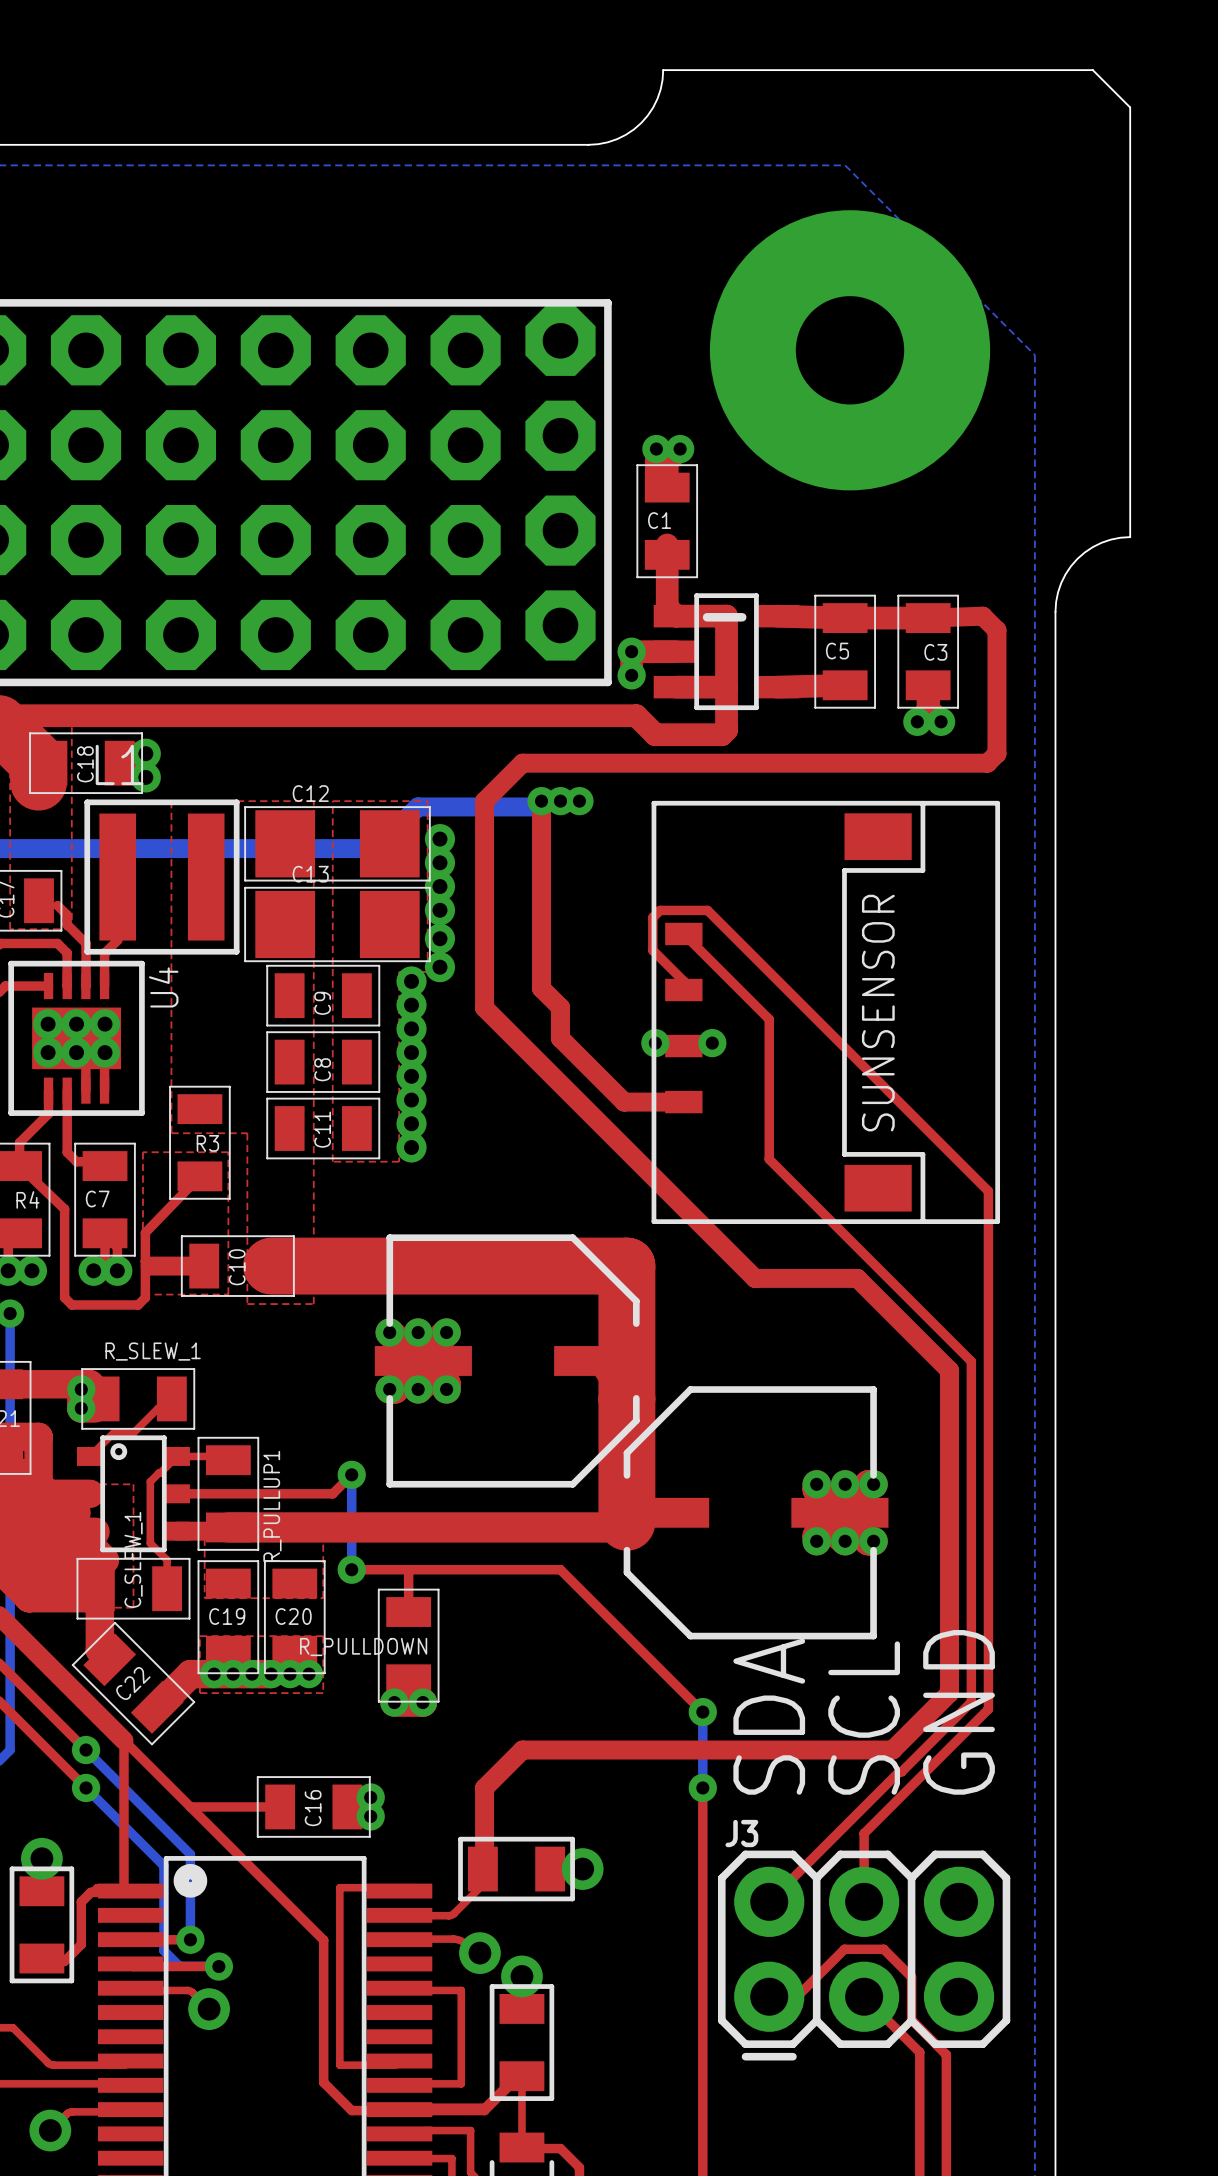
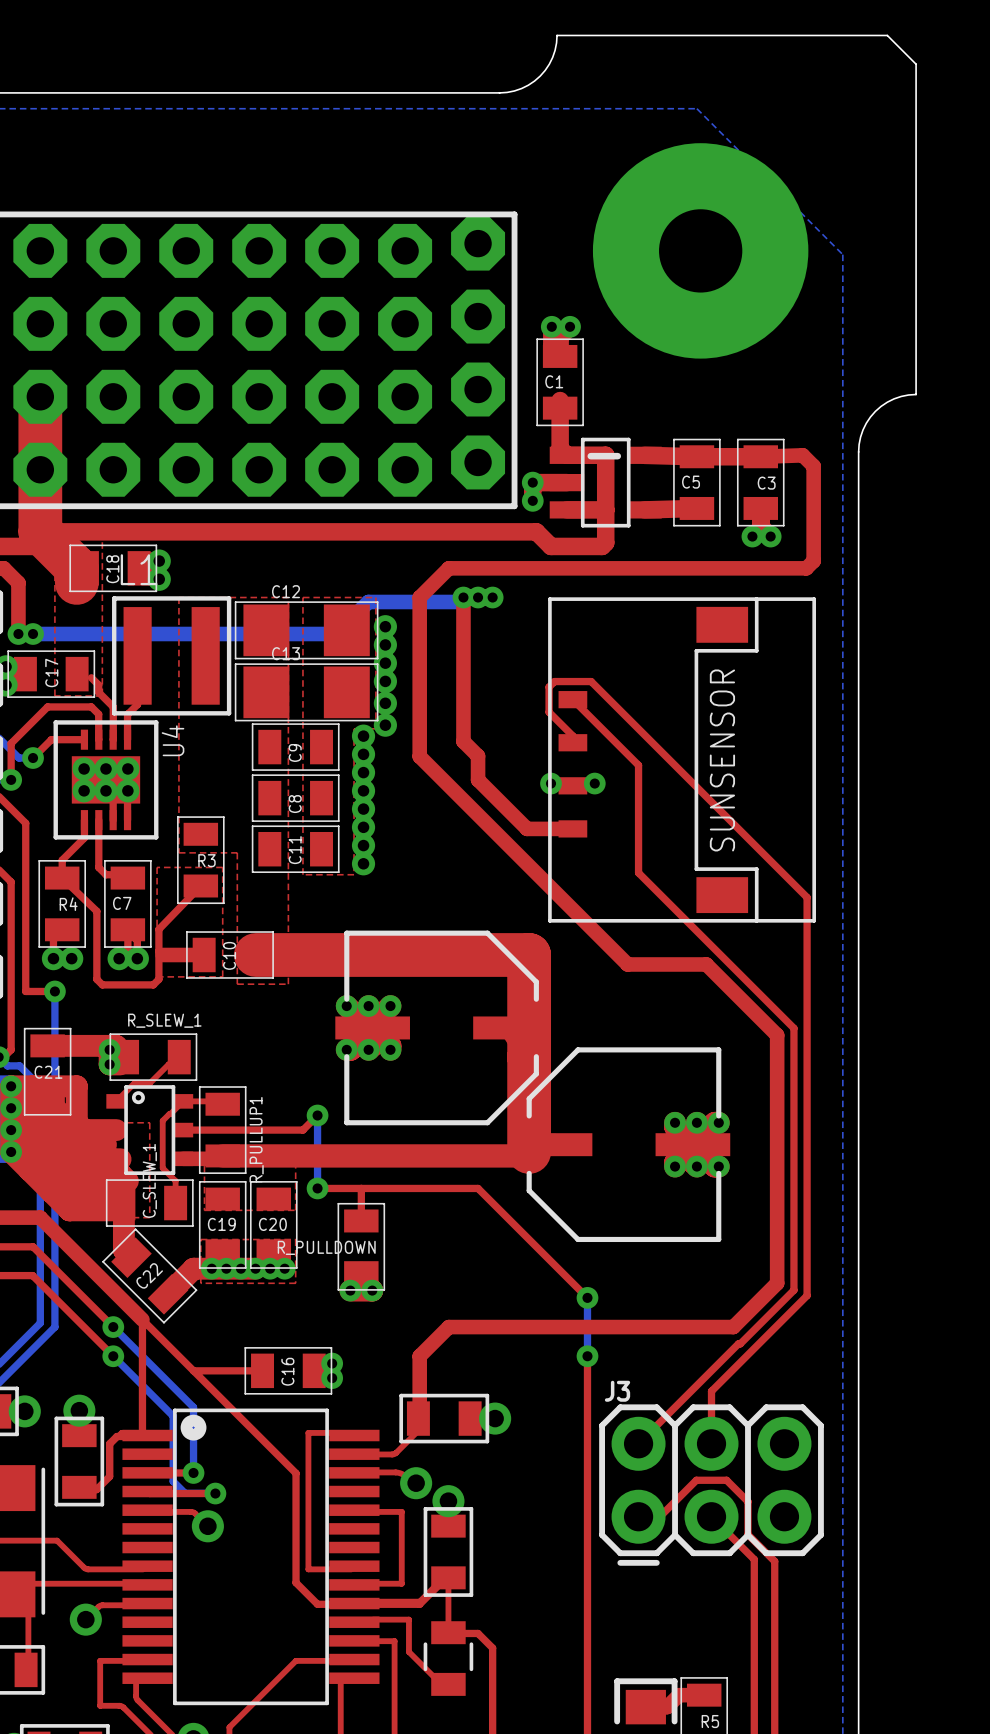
text: GND (959, 1712) -> none
text: SDA (769, 1716) -> none
text: SCL (864, 1718) -> none

